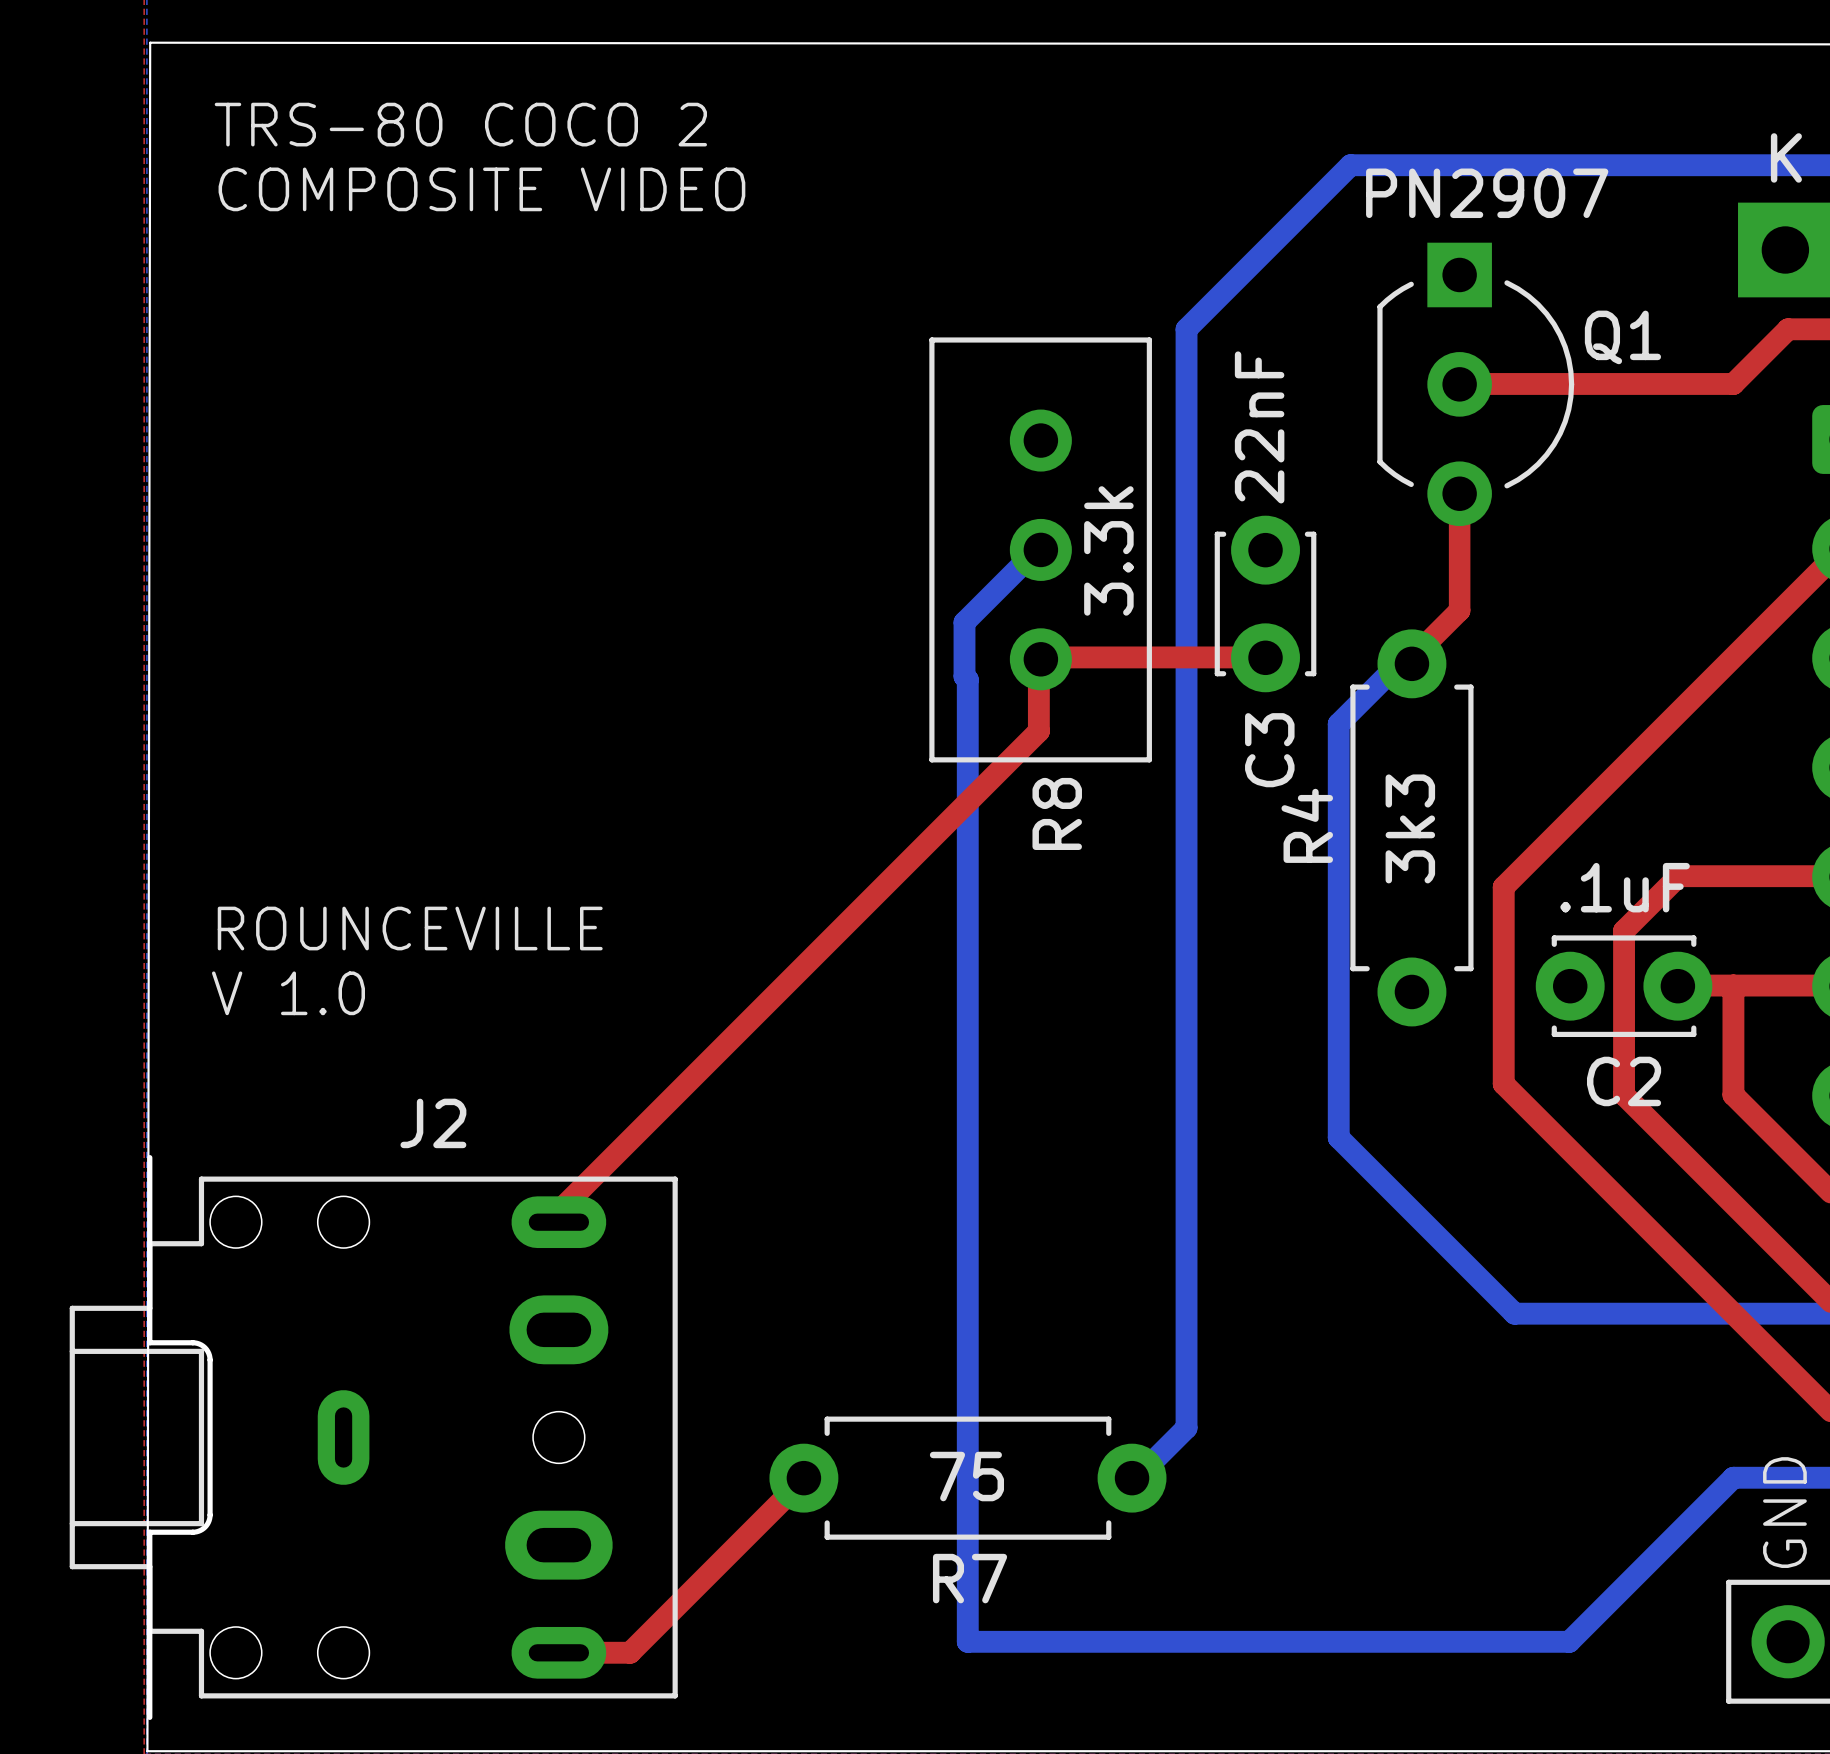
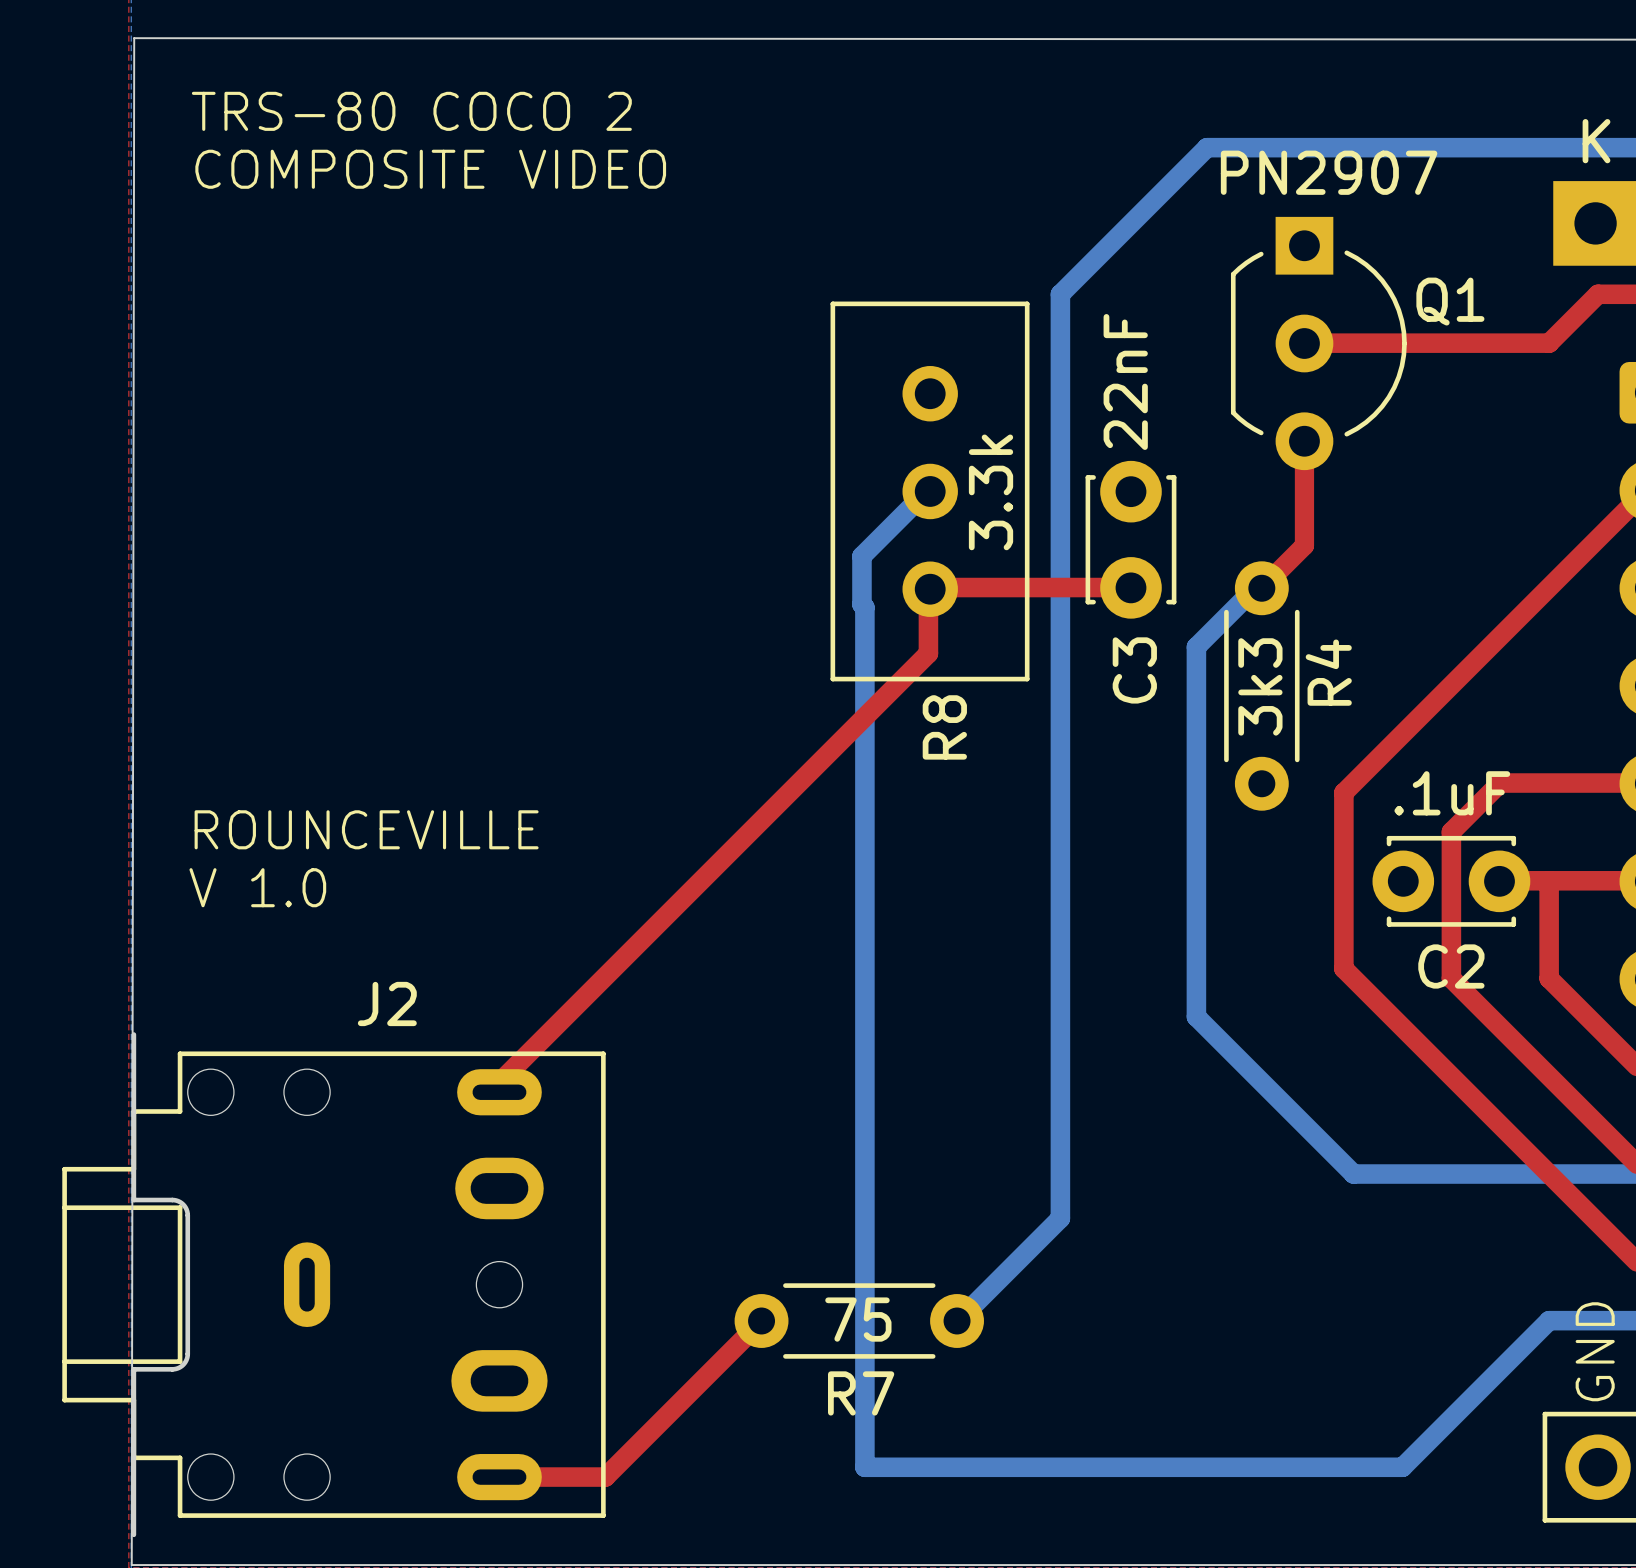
R4 footprint: [1350, 629, 1474, 1027] -> [1224, 561, 1300, 811]
R4 name position: R4 (1307, 825) -> R4 (1328, 672)
bottom track: (1186, 1363) (1186, 1427) (1136, 1478) (1132, 1478) -> (1060, 1218) (958, 1320)
R7 footprint: [769, 1416, 1167, 1540] -> [734, 1283, 984, 1359]
top track: (803, 1479) (630, 1652) -> (761, 1320) (605, 1477) (563, 1477)

